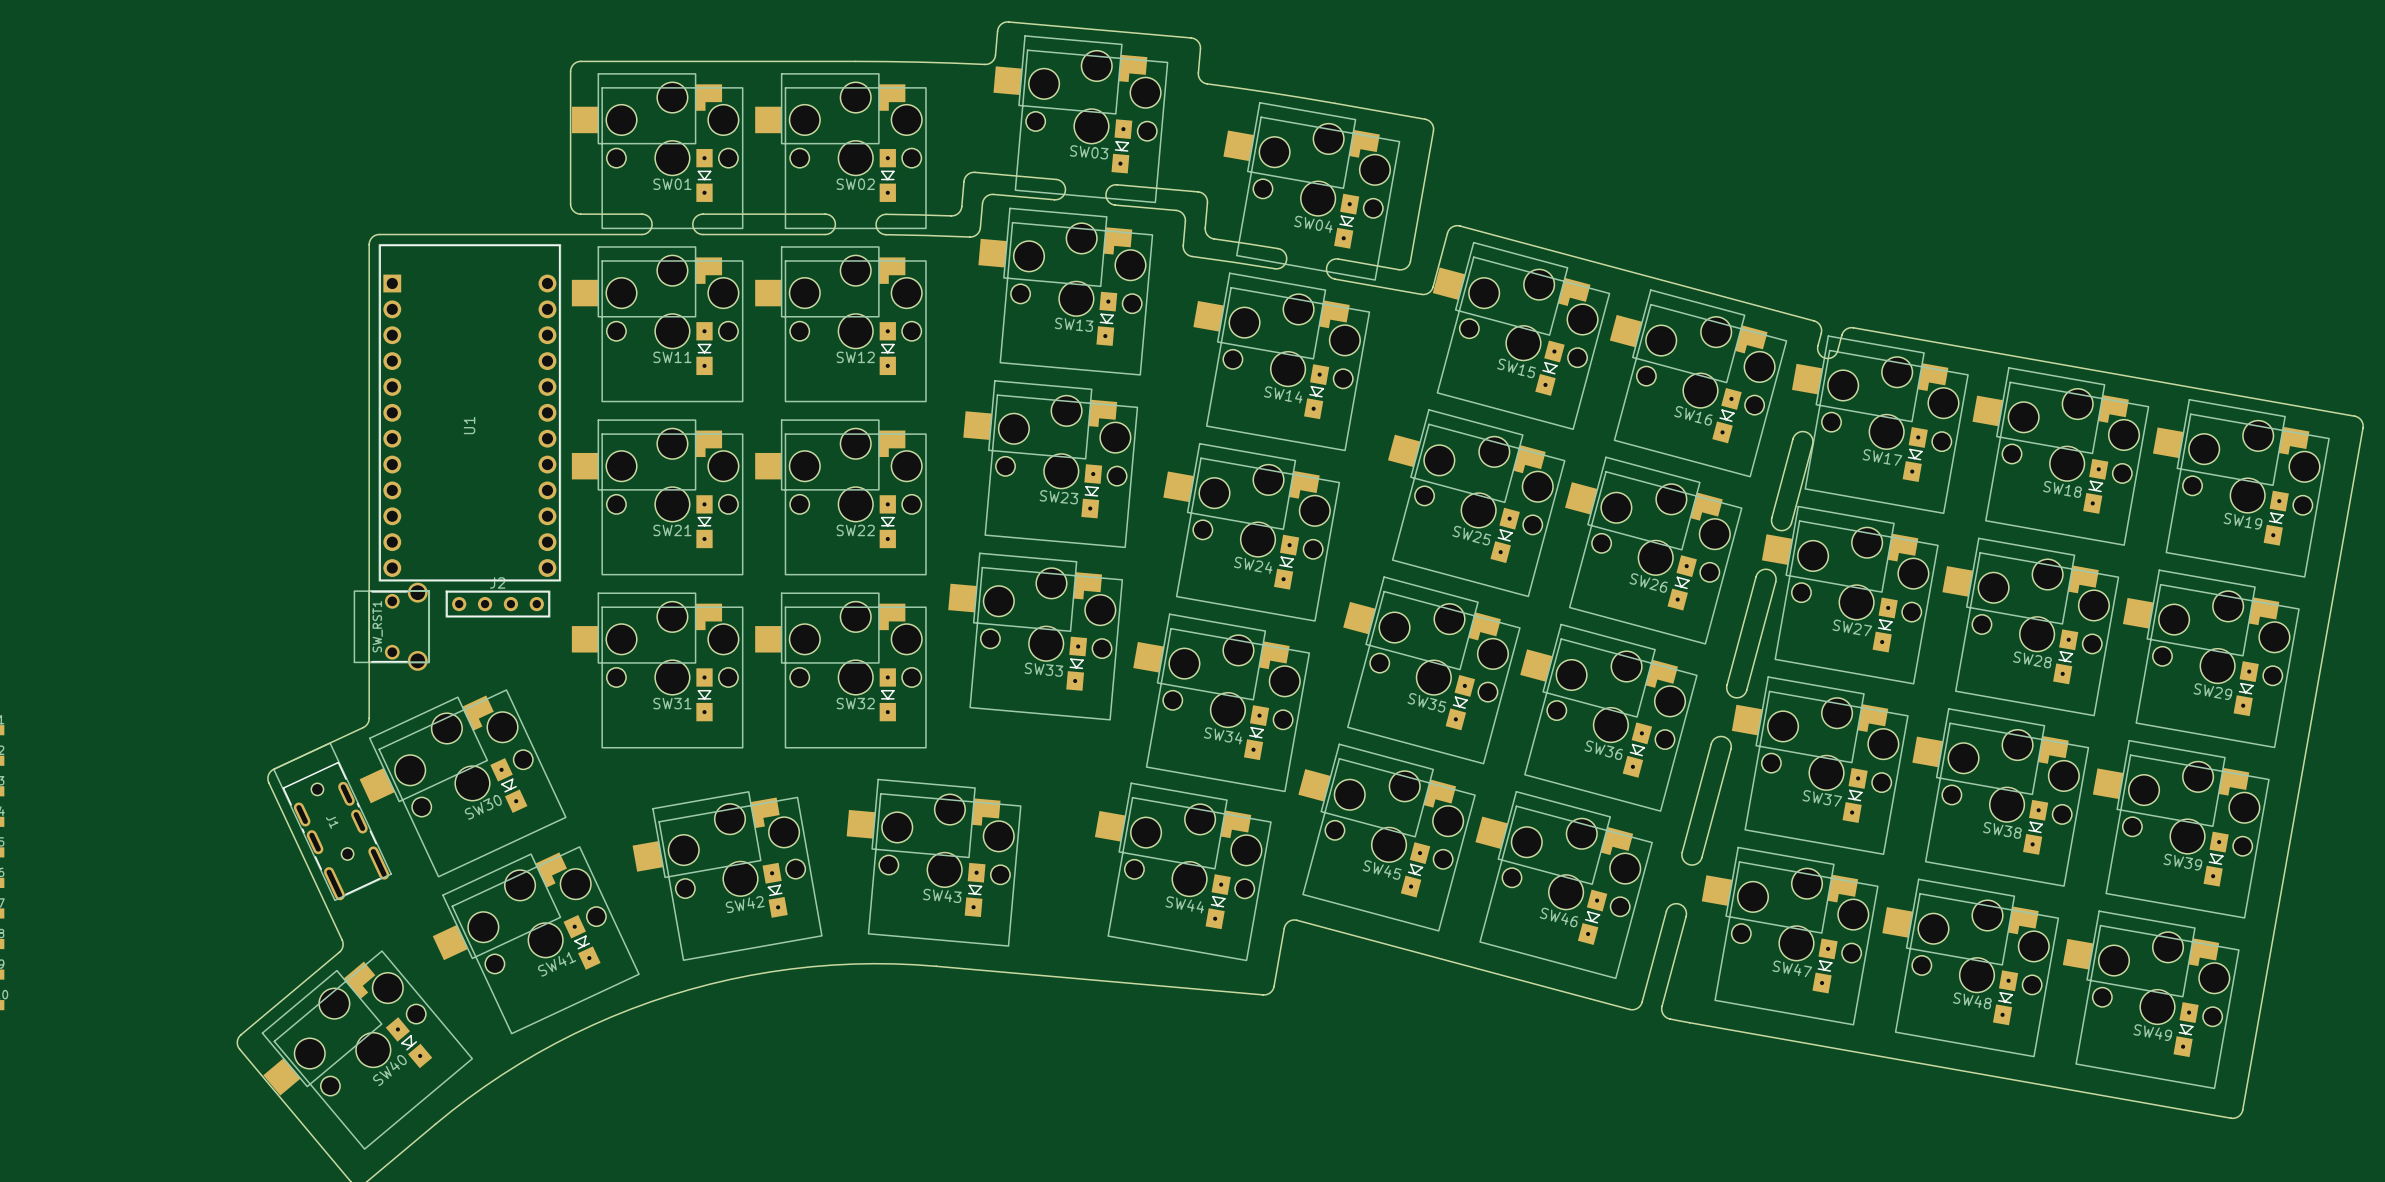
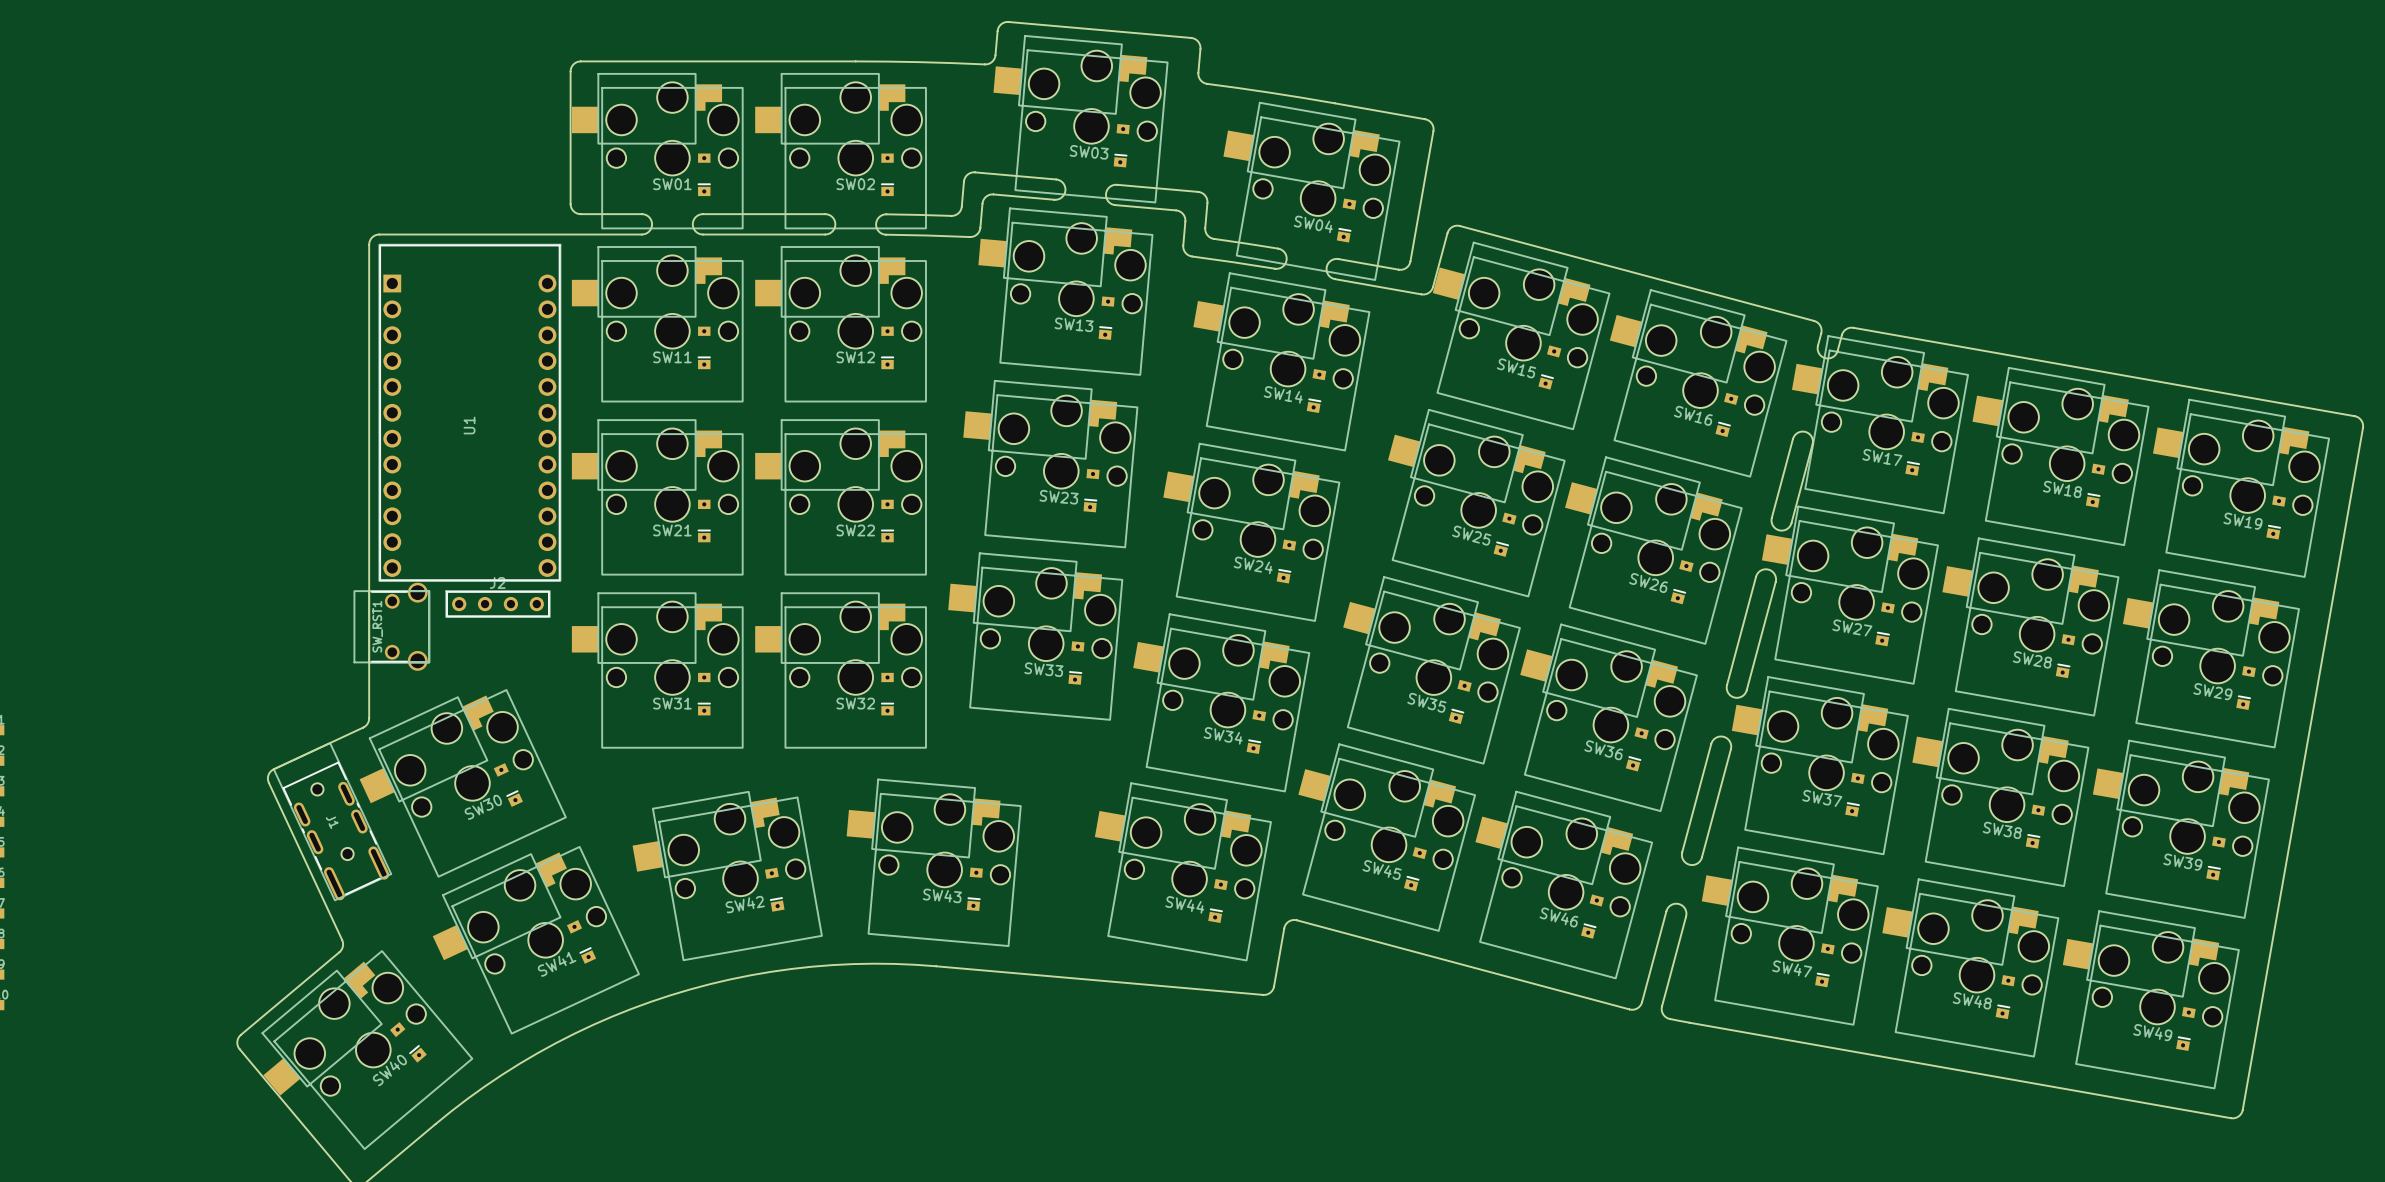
SW03 footprint: [993, 35, 1168, 203] -> [993, 35, 1168, 203]
SW01 footprint: [571, 73, 743, 229] -> [571, 73, 743, 229]
SW02 footprint: [755, 73, 926, 229] -> [755, 73, 926, 229]
SW04 footprint: [1223, 102, 1400, 281] -> [1223, 102, 1400, 281]
SW13 footprint: [978, 208, 1153, 375] -> [978, 208, 1153, 375]
SW15 footprint: [1432, 242, 1610, 430] -> [1432, 242, 1610, 430]
SW11 footprint: [571, 246, 743, 402] -> [571, 246, 743, 402]
SW12 footprint: [755, 246, 926, 402] -> [755, 246, 926, 402]
SW14 footprint: [1193, 273, 1370, 451] -> [1193, 273, 1370, 451]
SW16 footprint: [1609, 290, 1787, 477] -> [1609, 290, 1787, 477]
SW17 footprint: [1791, 336, 1969, 514] -> [1791, 336, 1969, 514]
SW18 footprint: [1972, 367, 2149, 546] -> [1972, 367, 2149, 546]
SW23 footprint: [963, 380, 1138, 548] -> [963, 380, 1138, 548]
SW19 footprint: [2152, 399, 2330, 577] -> [2152, 399, 2330, 577]
SW25 footprint: [1387, 409, 1565, 597] -> [1387, 409, 1565, 597]
SW21 footprint: [571, 420, 743, 575] -> [571, 420, 743, 575]
SW22 footprint: [755, 420, 926, 575] -> [755, 420, 926, 575]
SW24 footprint: [1163, 443, 1340, 621] -> [1163, 443, 1340, 621]
SW26 footprint: [1565, 457, 1742, 644] -> [1565, 457, 1742, 644]
SW27 footprint: [1761, 506, 1939, 684] -> [1761, 506, 1939, 684]
SW28 footprint: [1942, 538, 2119, 716] -> [1942, 538, 2119, 716]
SW33 footprint: [948, 553, 1123, 720] -> [948, 553, 1123, 720]
SW29 footprint: [2122, 570, 2300, 748] -> [2122, 570, 2300, 748]
SW35 footprint: [1343, 577, 1520, 764] -> [1343, 577, 1520, 764]
SW31 footprint: [571, 593, 743, 748] -> [571, 593, 743, 748]
SW32 footprint: [755, 593, 926, 748] -> [755, 593, 926, 748]
SW34 footprint: [1133, 614, 1310, 792] -> [1133, 614, 1310, 792]
SW36 footprint: [1520, 624, 1697, 812] -> [1520, 624, 1697, 812]
SW37 footprint: [1731, 677, 1908, 855] -> [1731, 677, 1908, 855]
SW30 footprint: [359, 690, 566, 877] -> [359, 690, 566, 877]
SW38 footprint: [1912, 708, 2089, 887] -> [1912, 708, 2089, 887]
SW39 footprint: [2092, 740, 2269, 918] -> [2092, 740, 2269, 918]
SW45 footprint: [1298, 744, 1476, 931] -> [1298, 744, 1476, 931]
SW43 footprint: [846, 779, 1021, 947] -> [846, 779, 1021, 947]
SW44 footprint: [1094, 783, 1271, 961] -> [1094, 783, 1271, 961]
SW42 footprint: [632, 791, 822, 961] -> [632, 791, 822, 961]
SW46 footprint: [1475, 791, 1653, 979] -> [1475, 791, 1653, 979]
SW41 footprint: [432, 846, 640, 1034] -> [432, 846, 640, 1034]
SW47 footprint: [1701, 847, 1878, 1025] -> [1701, 847, 1878, 1025]
SW48 footprint: [1882, 879, 2059, 1057] -> [1882, 879, 2059, 1057]
SW49 footprint: [2062, 911, 2239, 1089] -> [2062, 911, 2239, 1089]
SW40 footprint: [262, 951, 473, 1150] -> [262, 951, 473, 1150]

